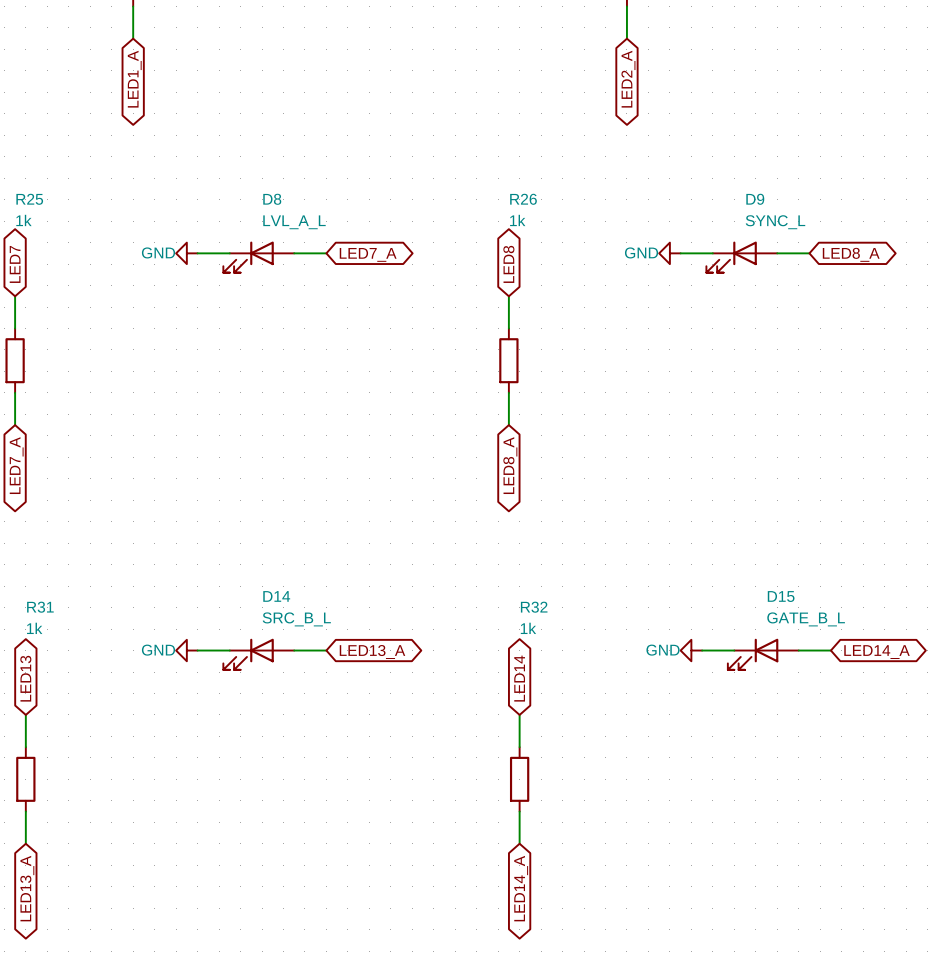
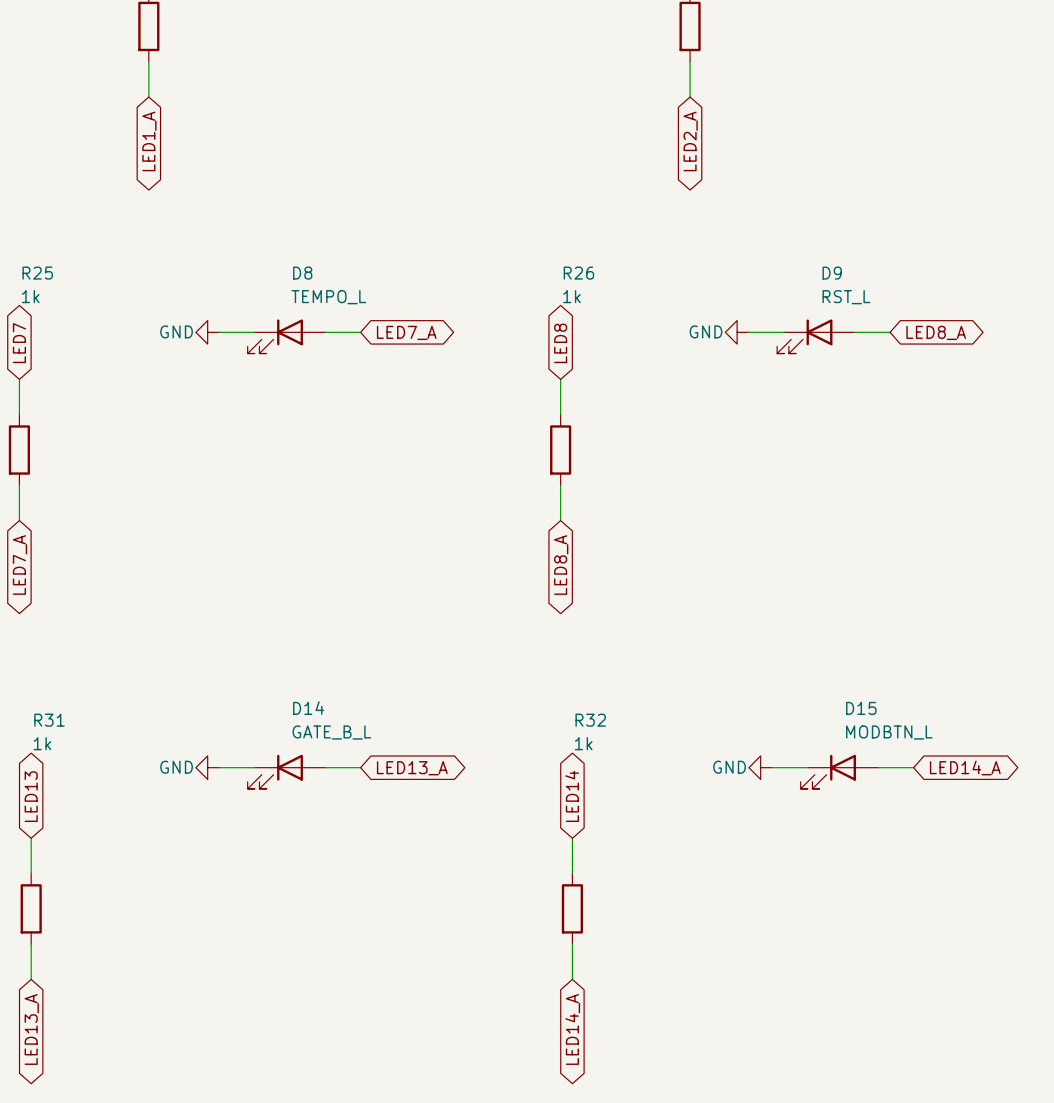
D8 value: LVL_A_L (294, 222) -> TEMPO_L (328, 297)
D9 value: SYNC_L (775, 222) -> RST_L (846, 297)
D14 value: SRC_B_L (296, 619) -> GATE_B_L (331, 732)
D15 value: GATE_B_L (806, 619) -> MODBTN_L (889, 732)

